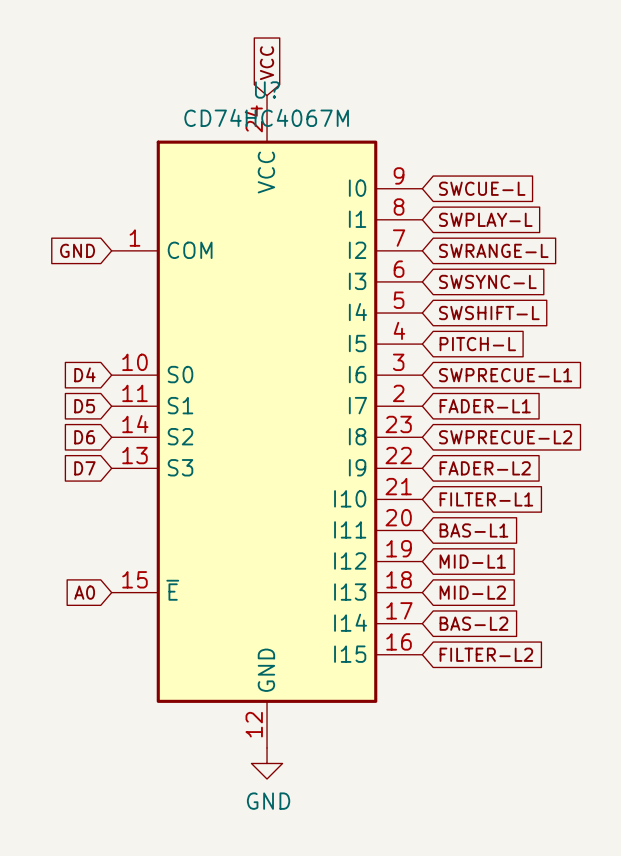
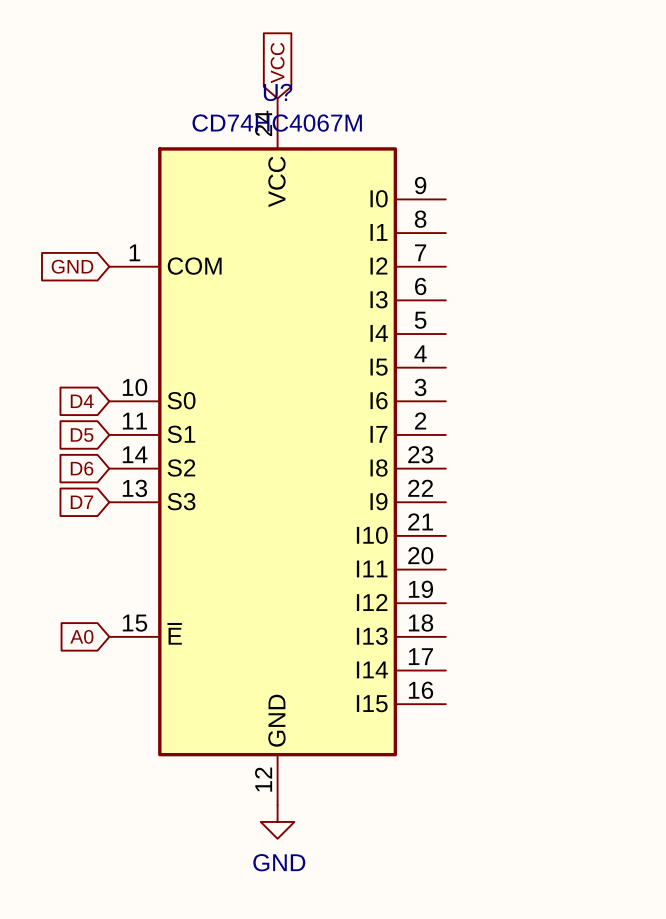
global label: SWCUE-L (482, 188) -> none
global label: SWPLAY-L (485, 219) -> none
global label: SWRANGE-L (493, 250) -> none
global label: SWSYNC-L (487, 281) -> none
global label: SWSHIFT-L (489, 313) -> none
global label: PITCH-L (477, 344) -> none
global label: SWPRECUE-L1 (505, 375) -> none
global label: FADER-L1 (485, 406) -> none
global label: SWPRECUE-L2 (505, 437) -> none
global label: FADER-L2 (485, 468) -> none
global label: FILTER-L1 (486, 499) -> none
global label: BAS-L1 (473, 530) -> none
global label: MID-L1 (472, 561) -> none
global label: MID-L2 (472, 592) -> none
global label: BAS-L2 (473, 623) -> none
global label: FILTER-L2 (486, 654) -> none

